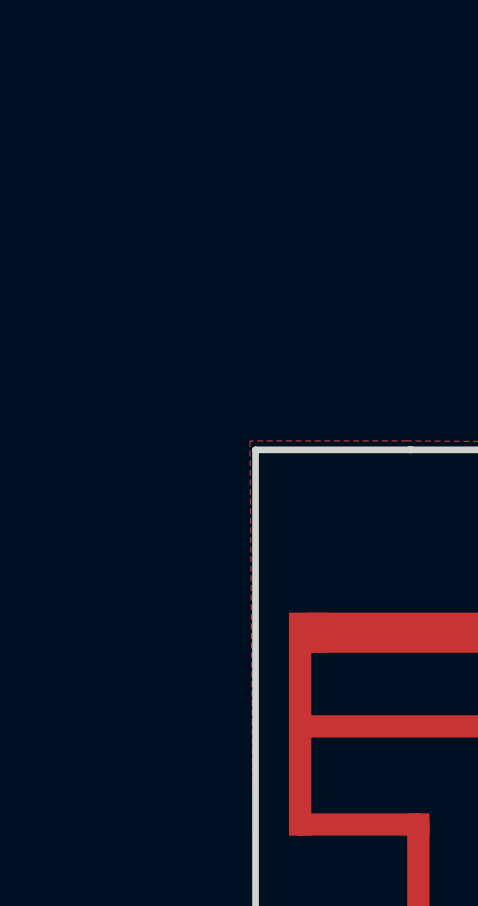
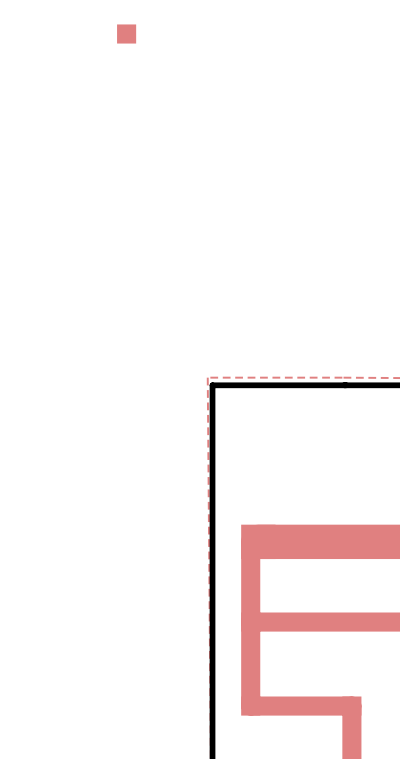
part: none -> (126, 33)

